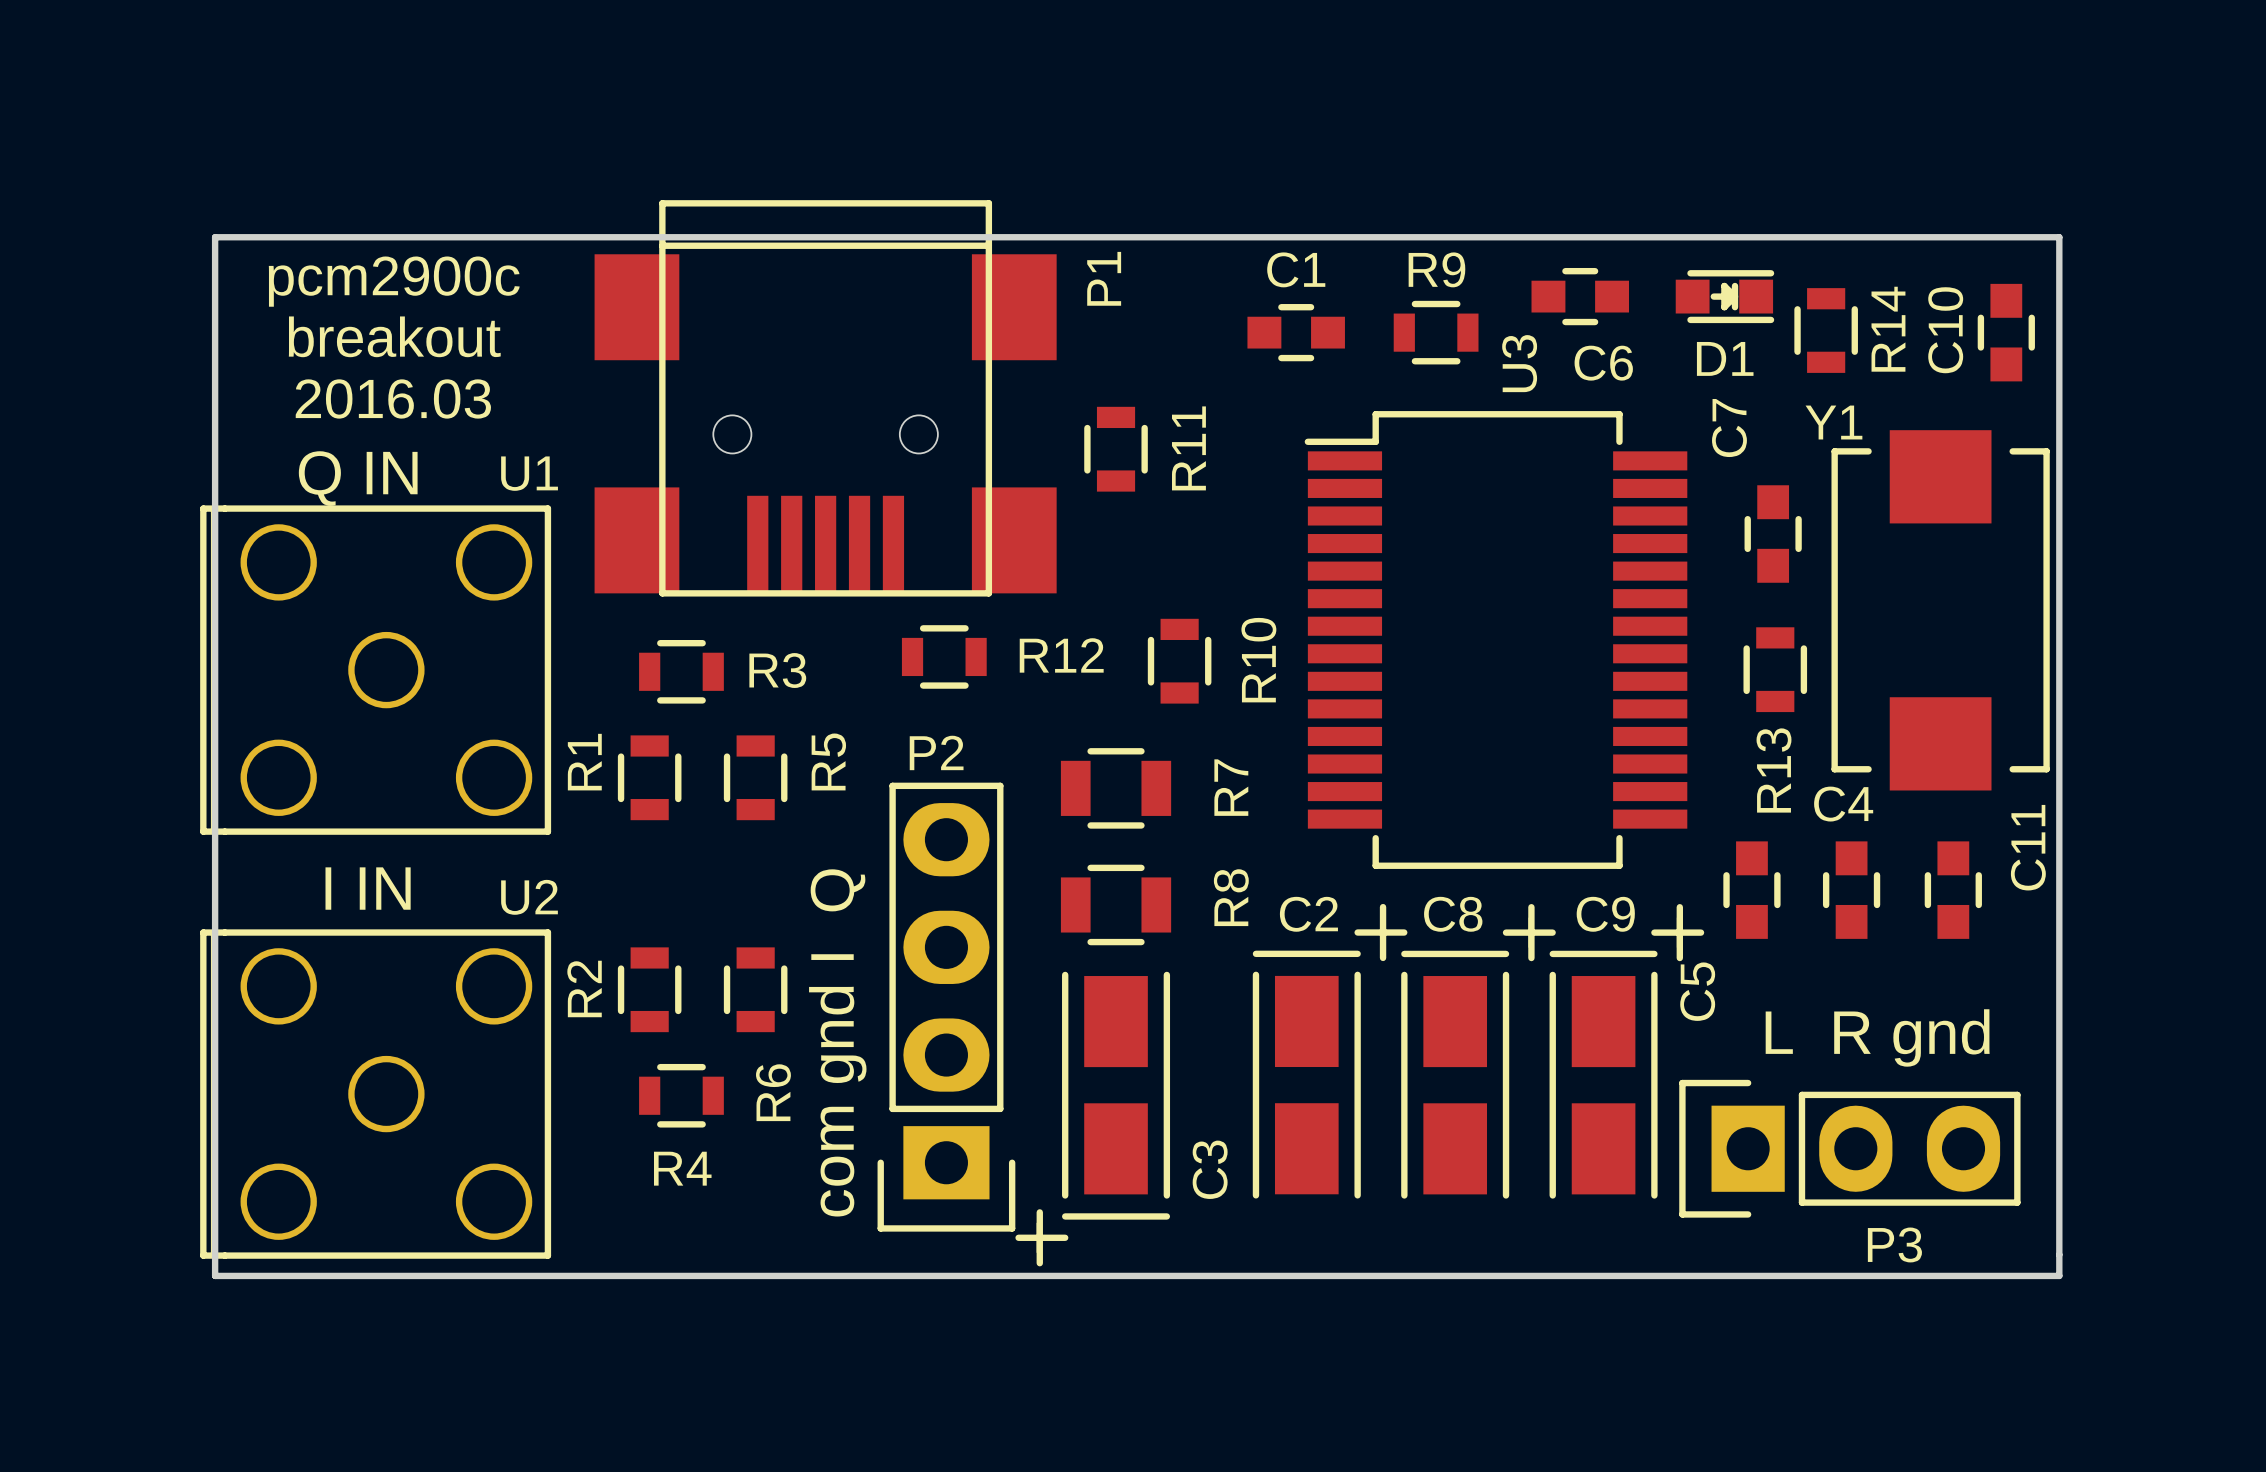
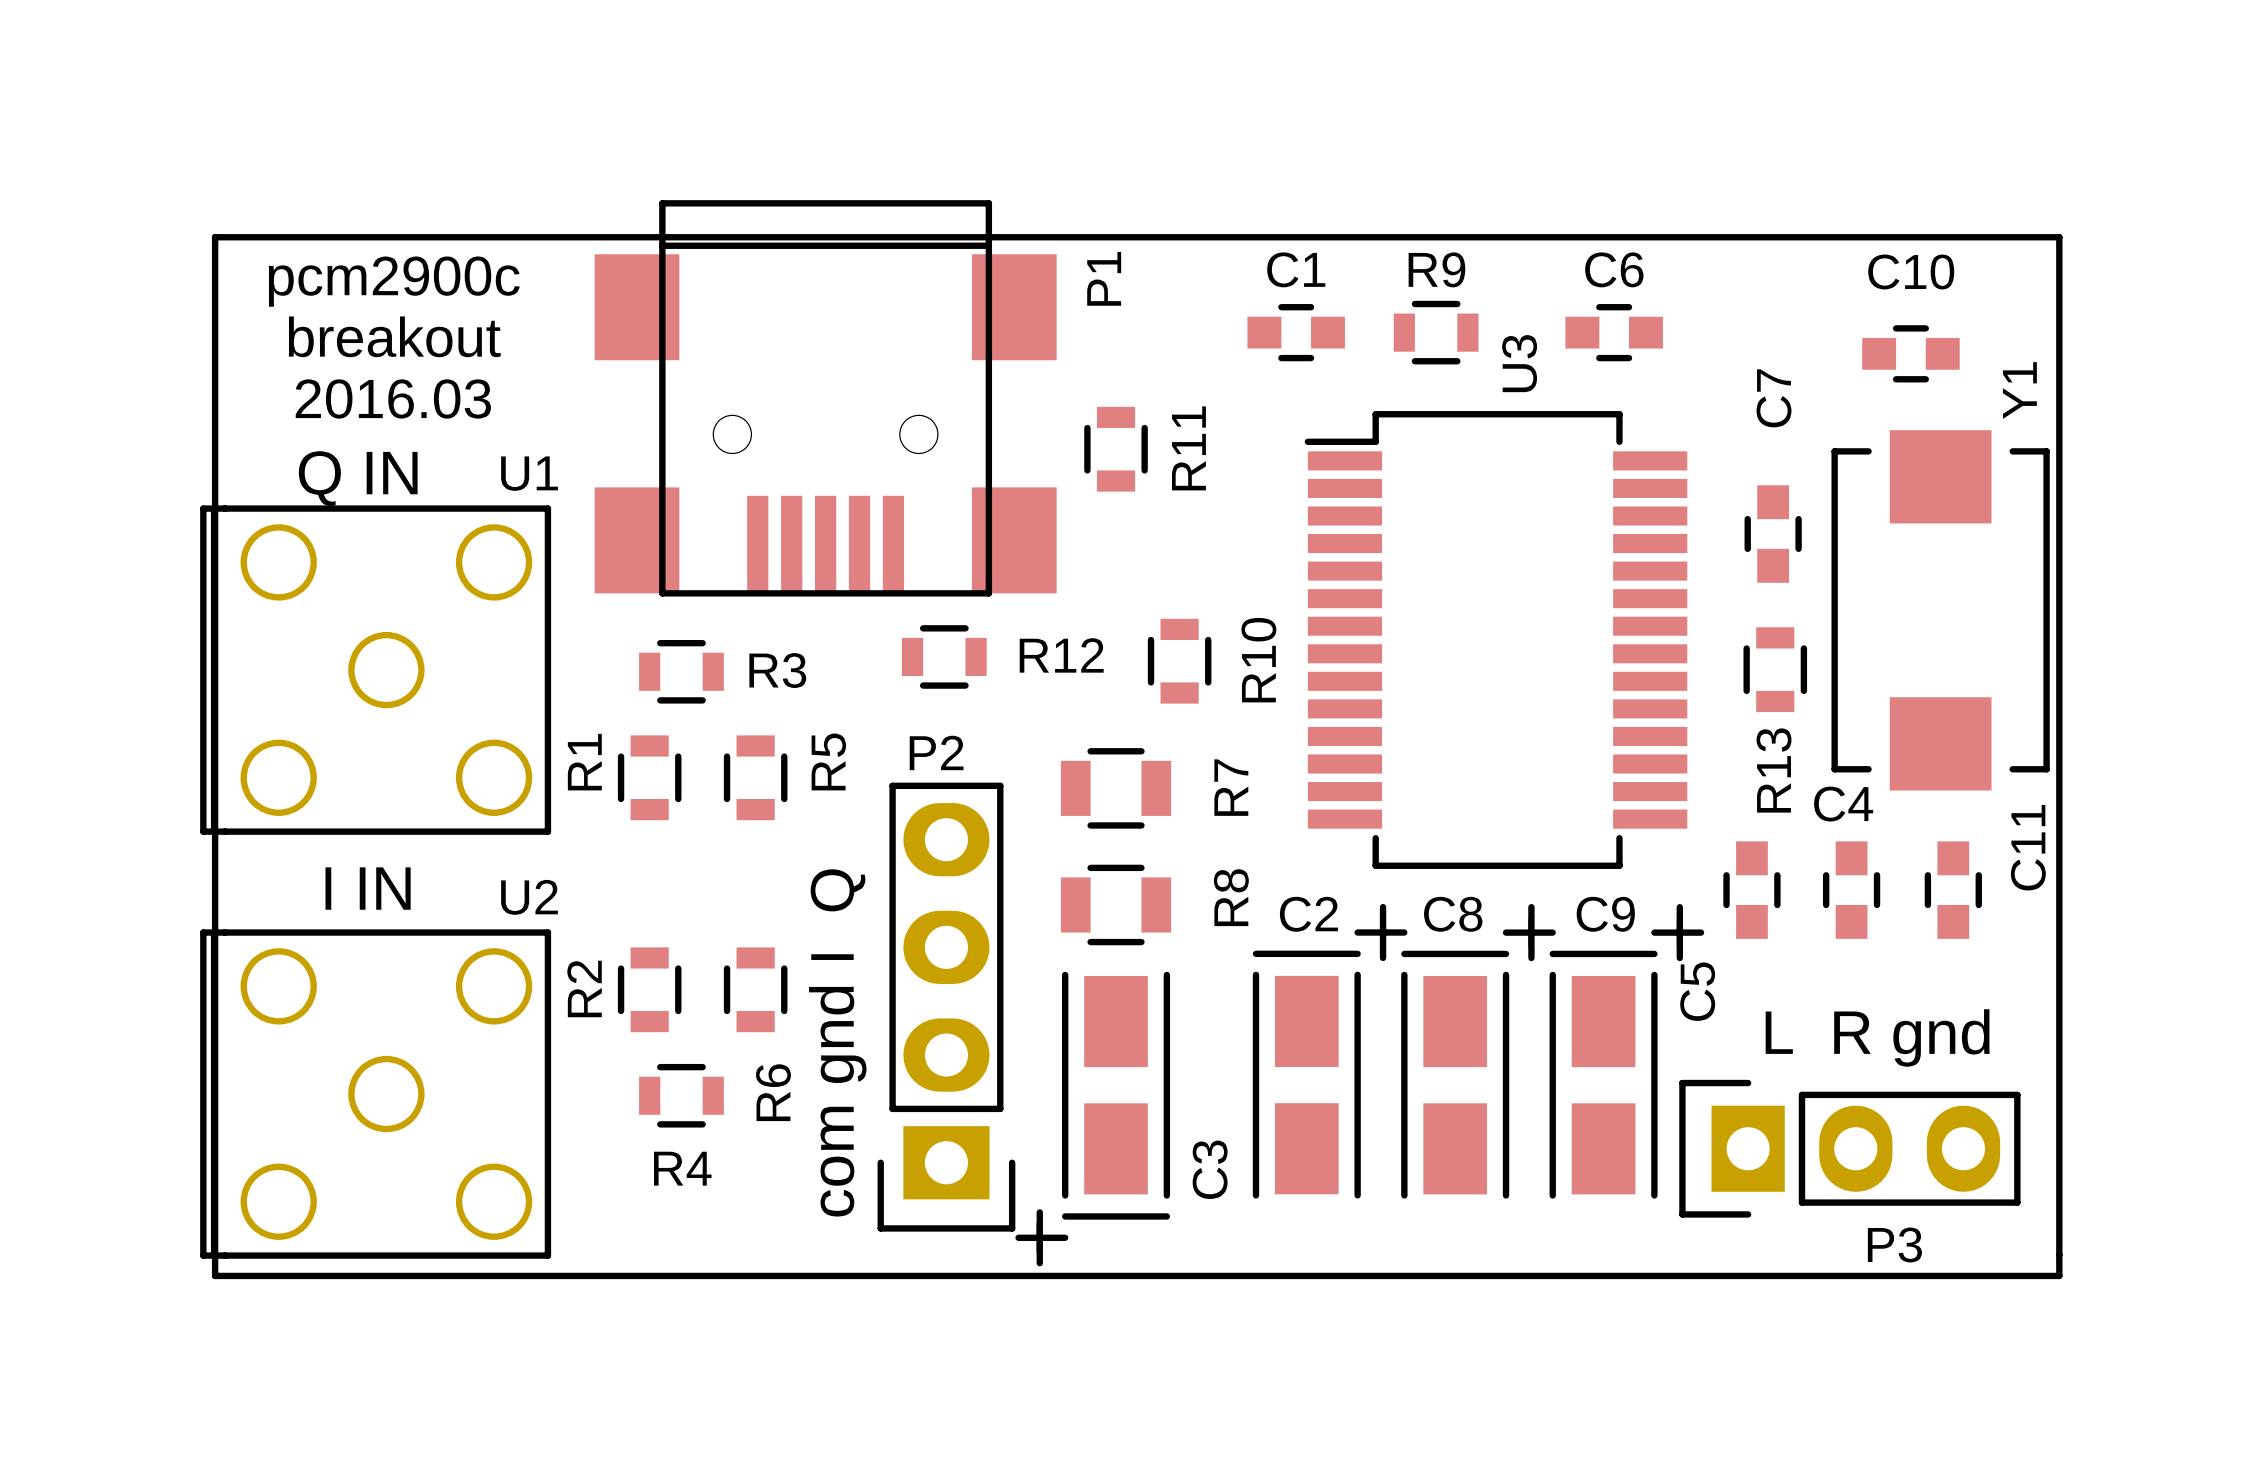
C6 position: (1580, 296) -> (1614, 332)
D1: (1724, 296) -> none
R14: (1826, 330) -> none
C10 rotation: 0° (2006, 332) -> 90° clockwise (1910, 353)
C10 position: (2006, 332) -> (1910, 353)
C6 name position: C6 (1603, 363) -> C6 (1614, 269)
Y1 name rotation: 0° (1833, 422) -> 90° counterclockwise (2019, 390)
Y1 name position: Y1 (1833, 422) -> Y1 (2019, 390)
C7 name position: C7 (1729, 428) -> C7 (1773, 398)

